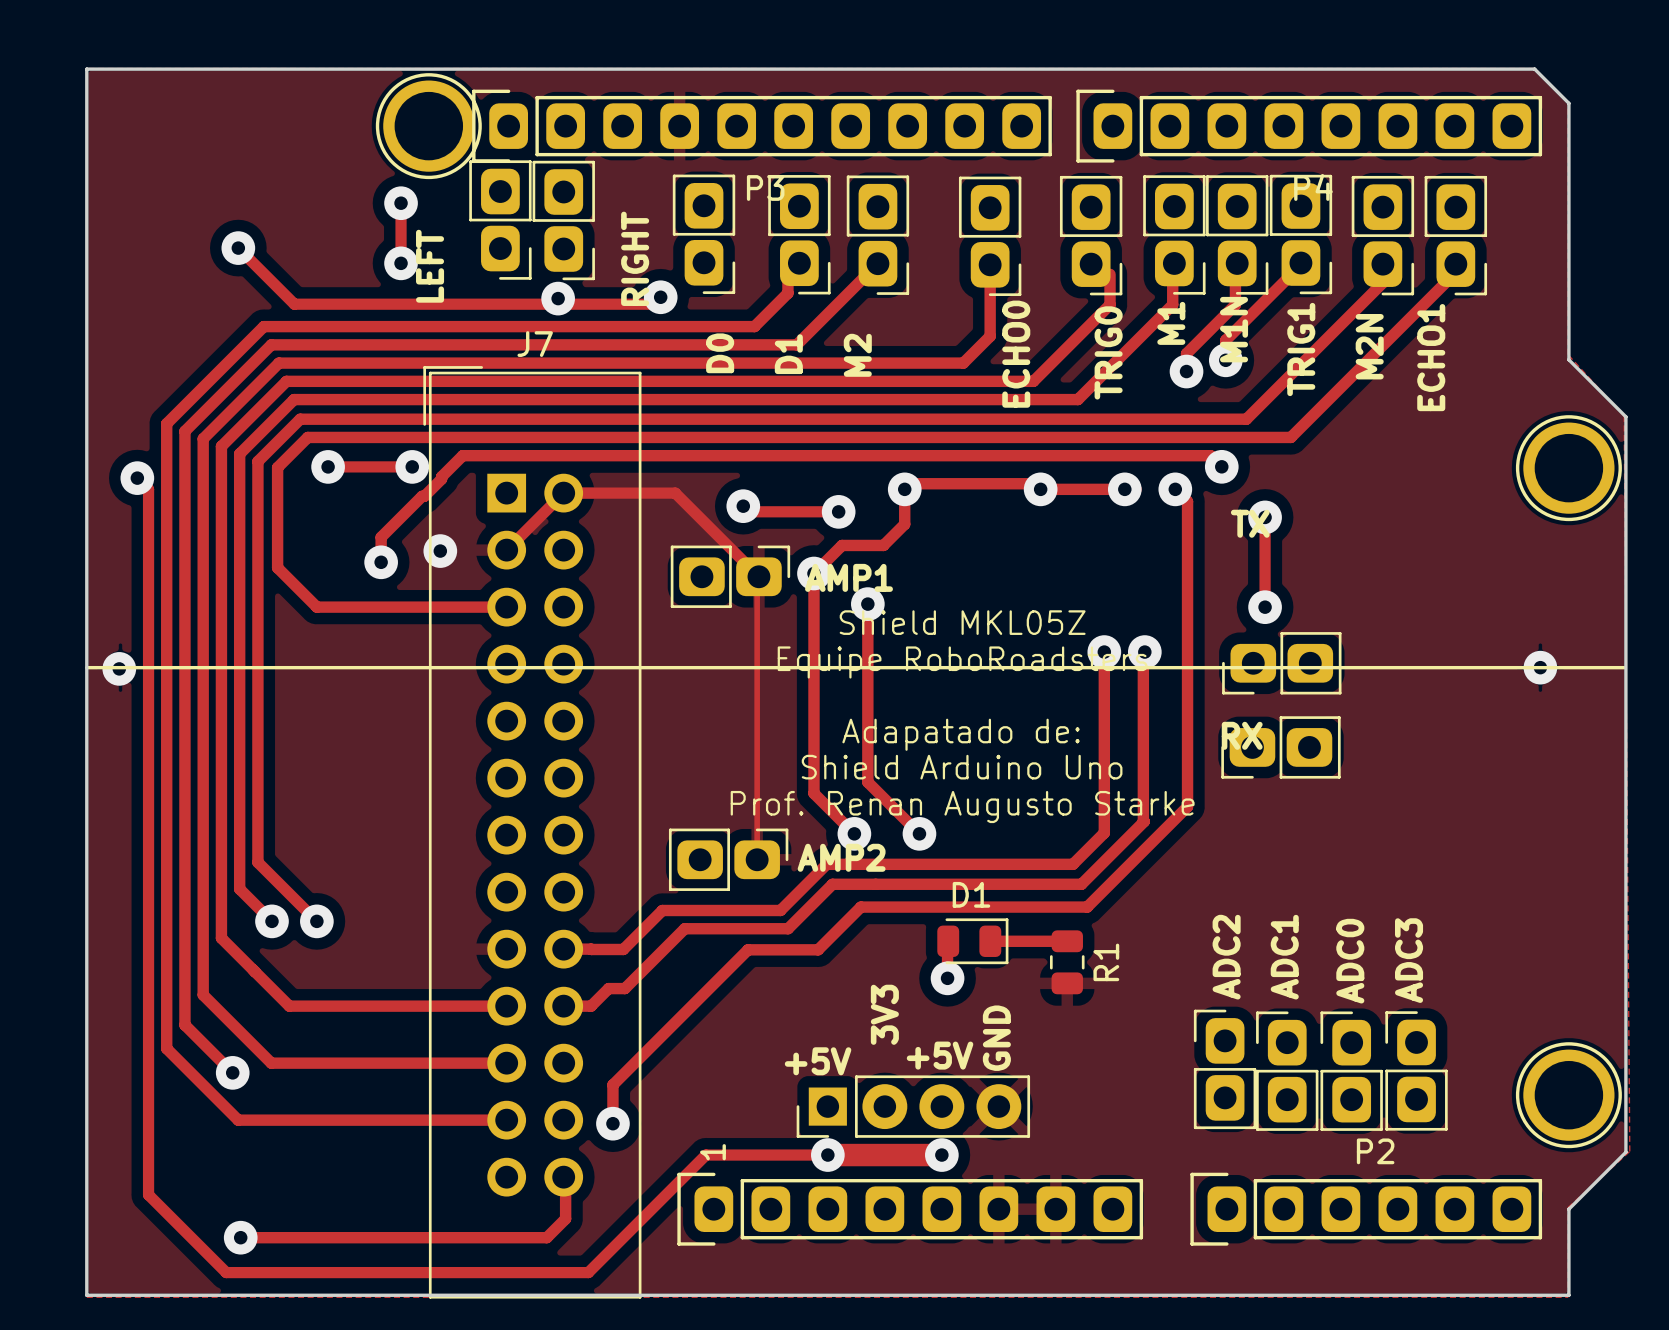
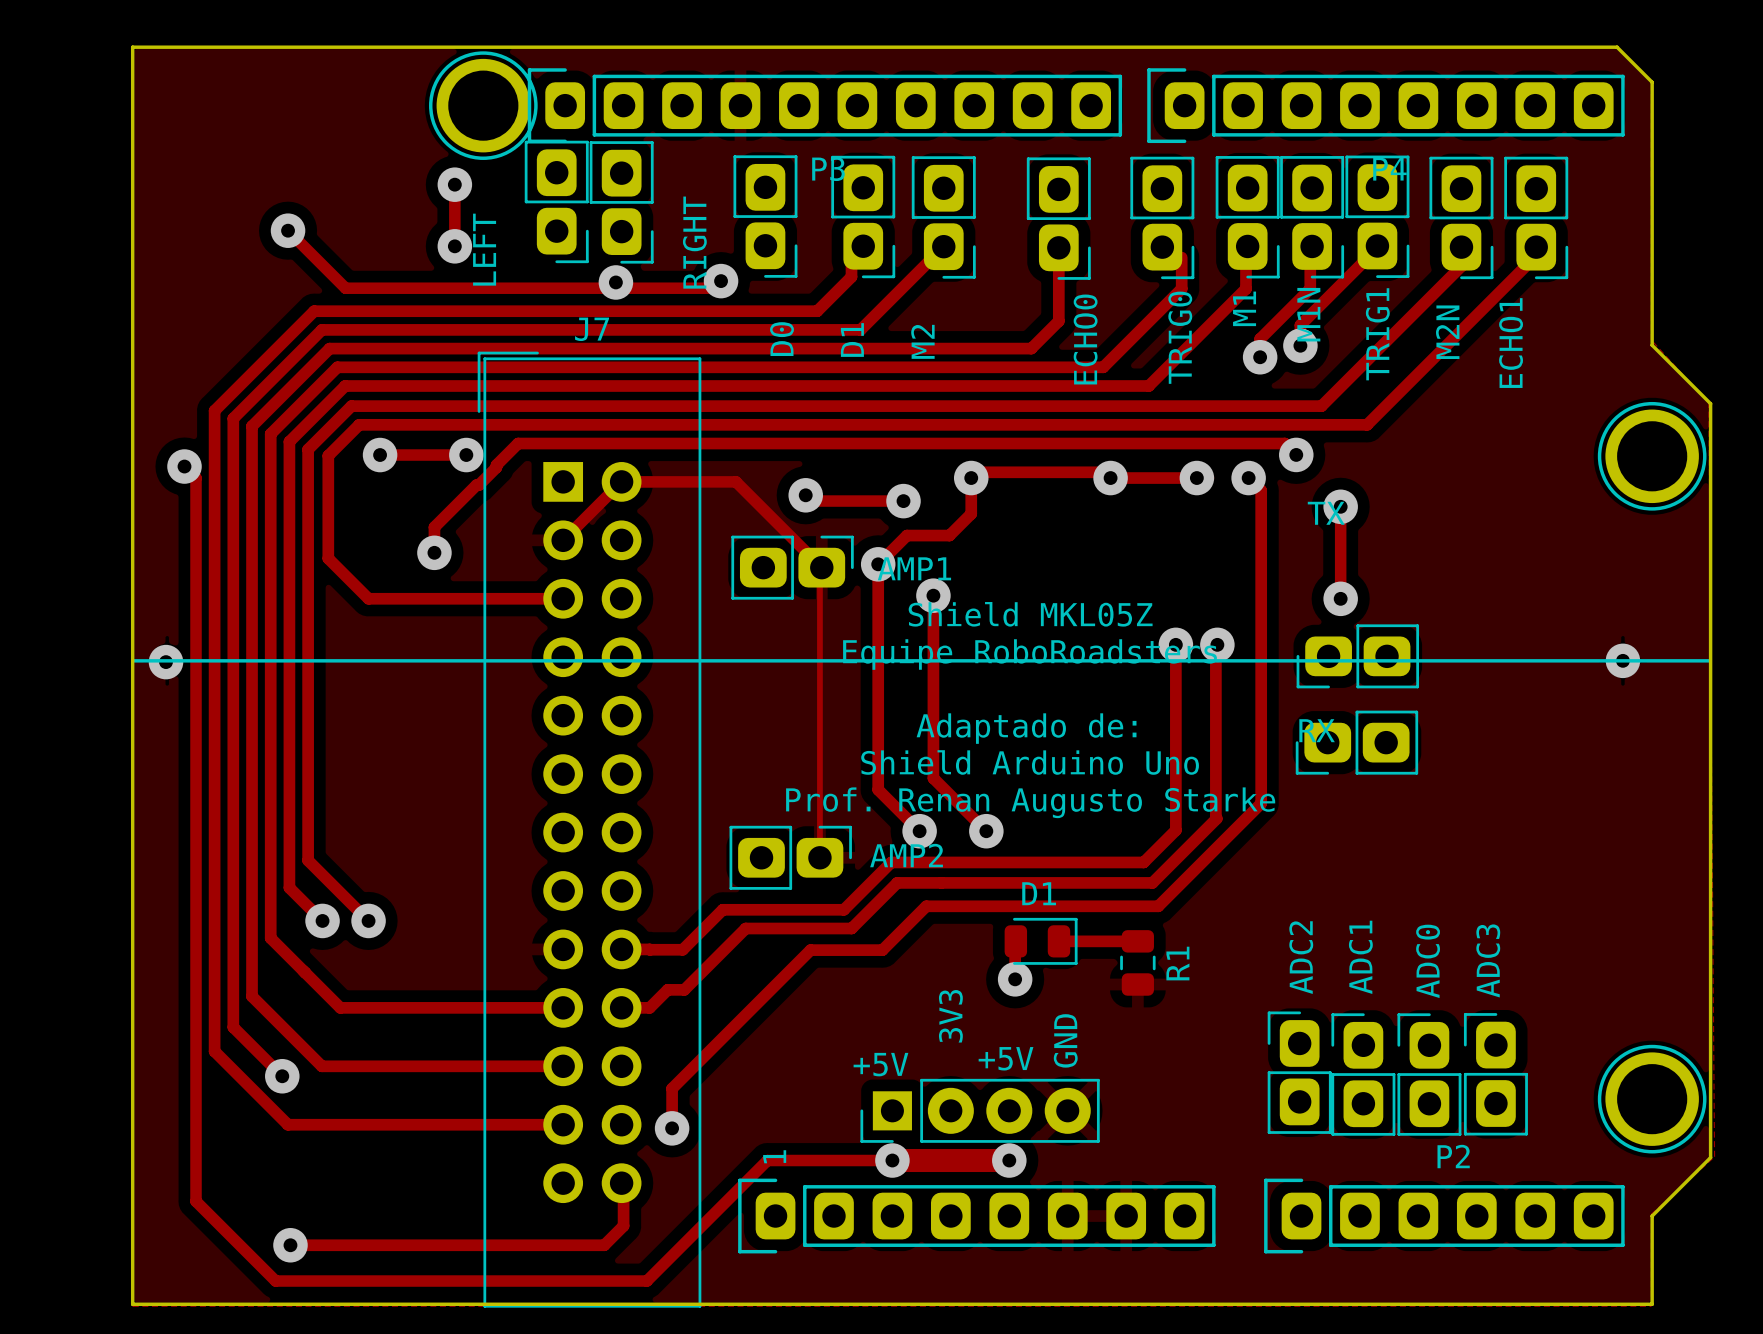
via: (440, 551) -> none
text: Adapatado de: (961, 734) -> Adaptado de: (1026, 728)

